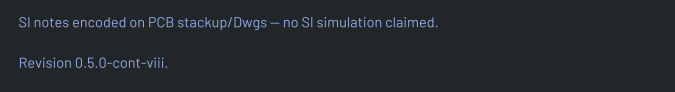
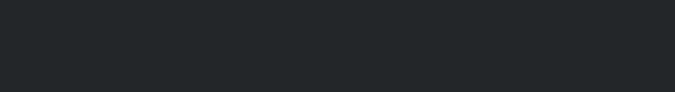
text: SI notes encoded on PCB stackup/Dwgs — no SI simulation claimed. (228, 23) -> none
text: Revision 0.5.0-cont-viii. (93, 62) -> none

